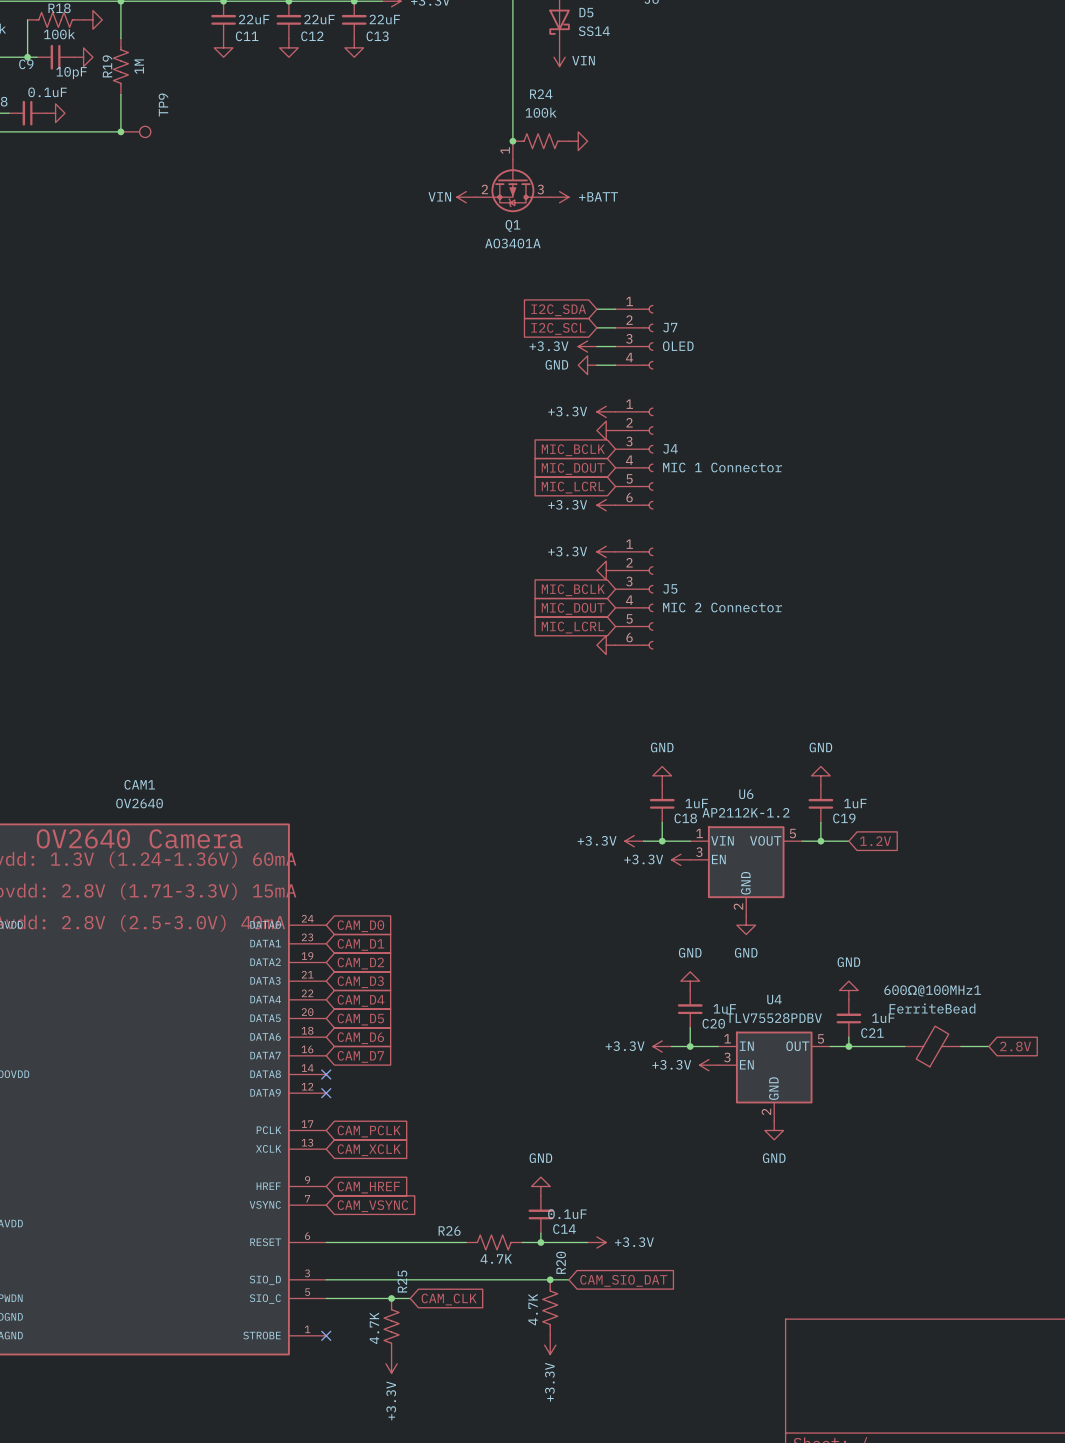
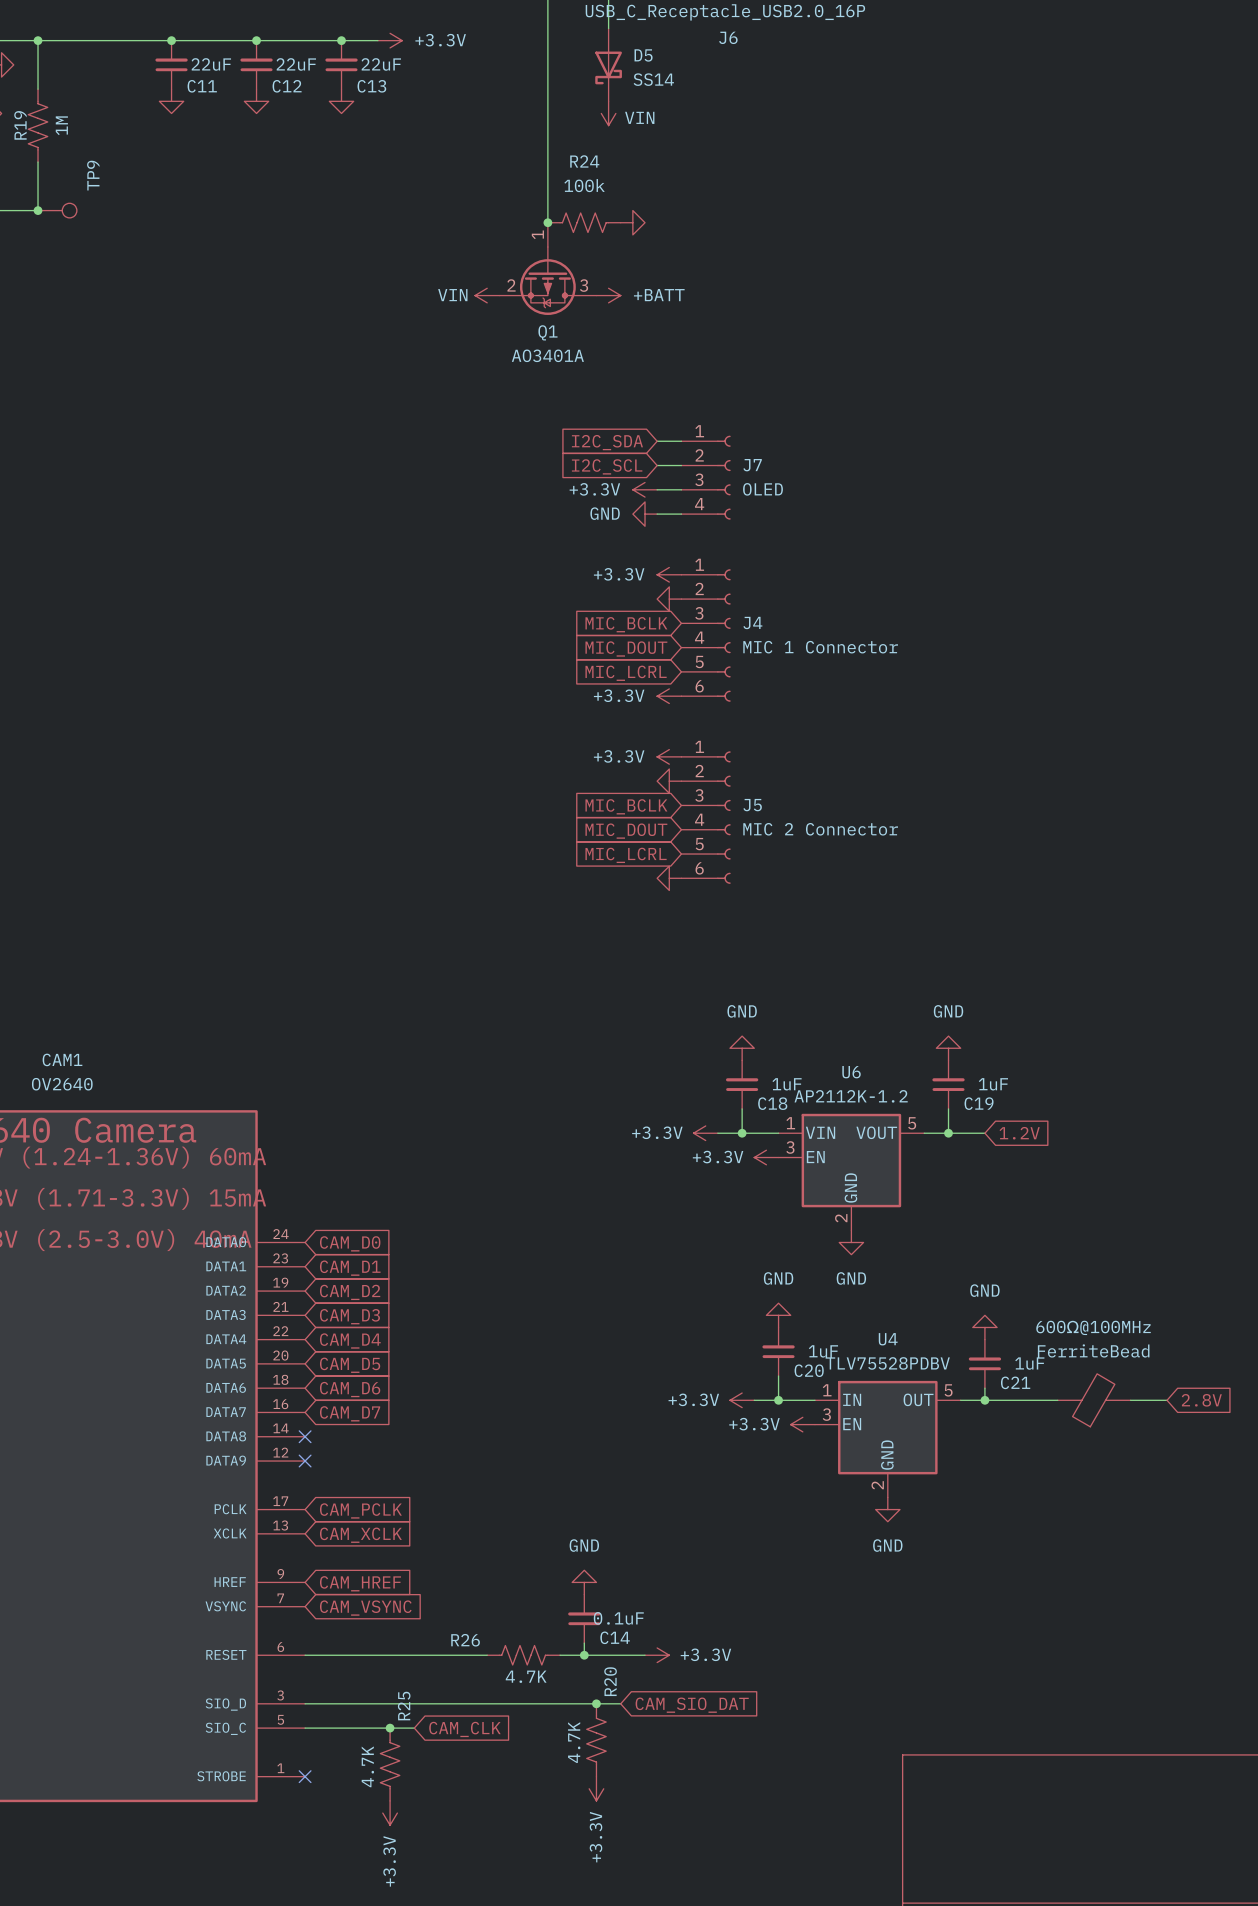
600Ω@100MHz1 name: 600Ω@100MHz1 (932, 990) -> 600Ω@100MHz (1093, 1327)

